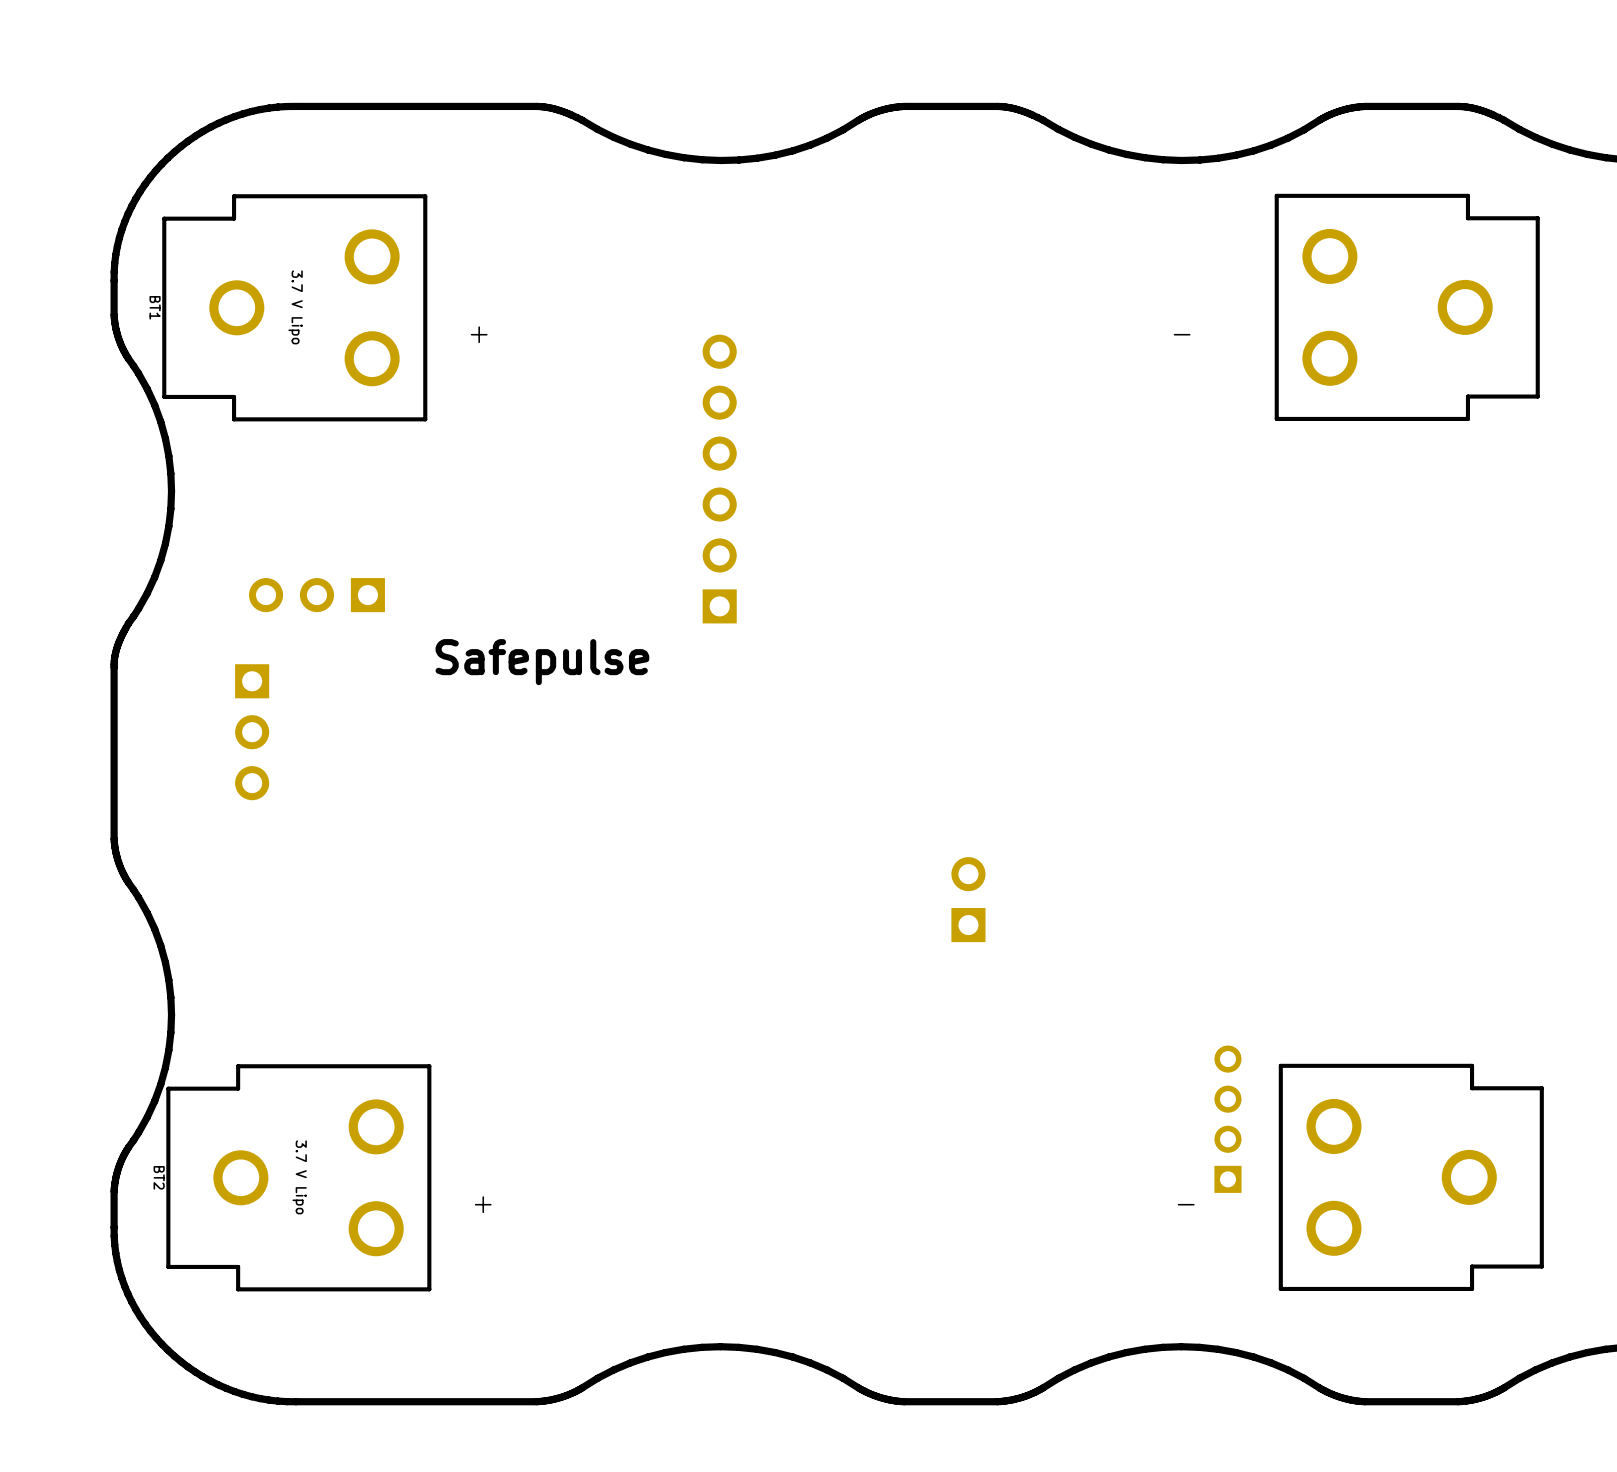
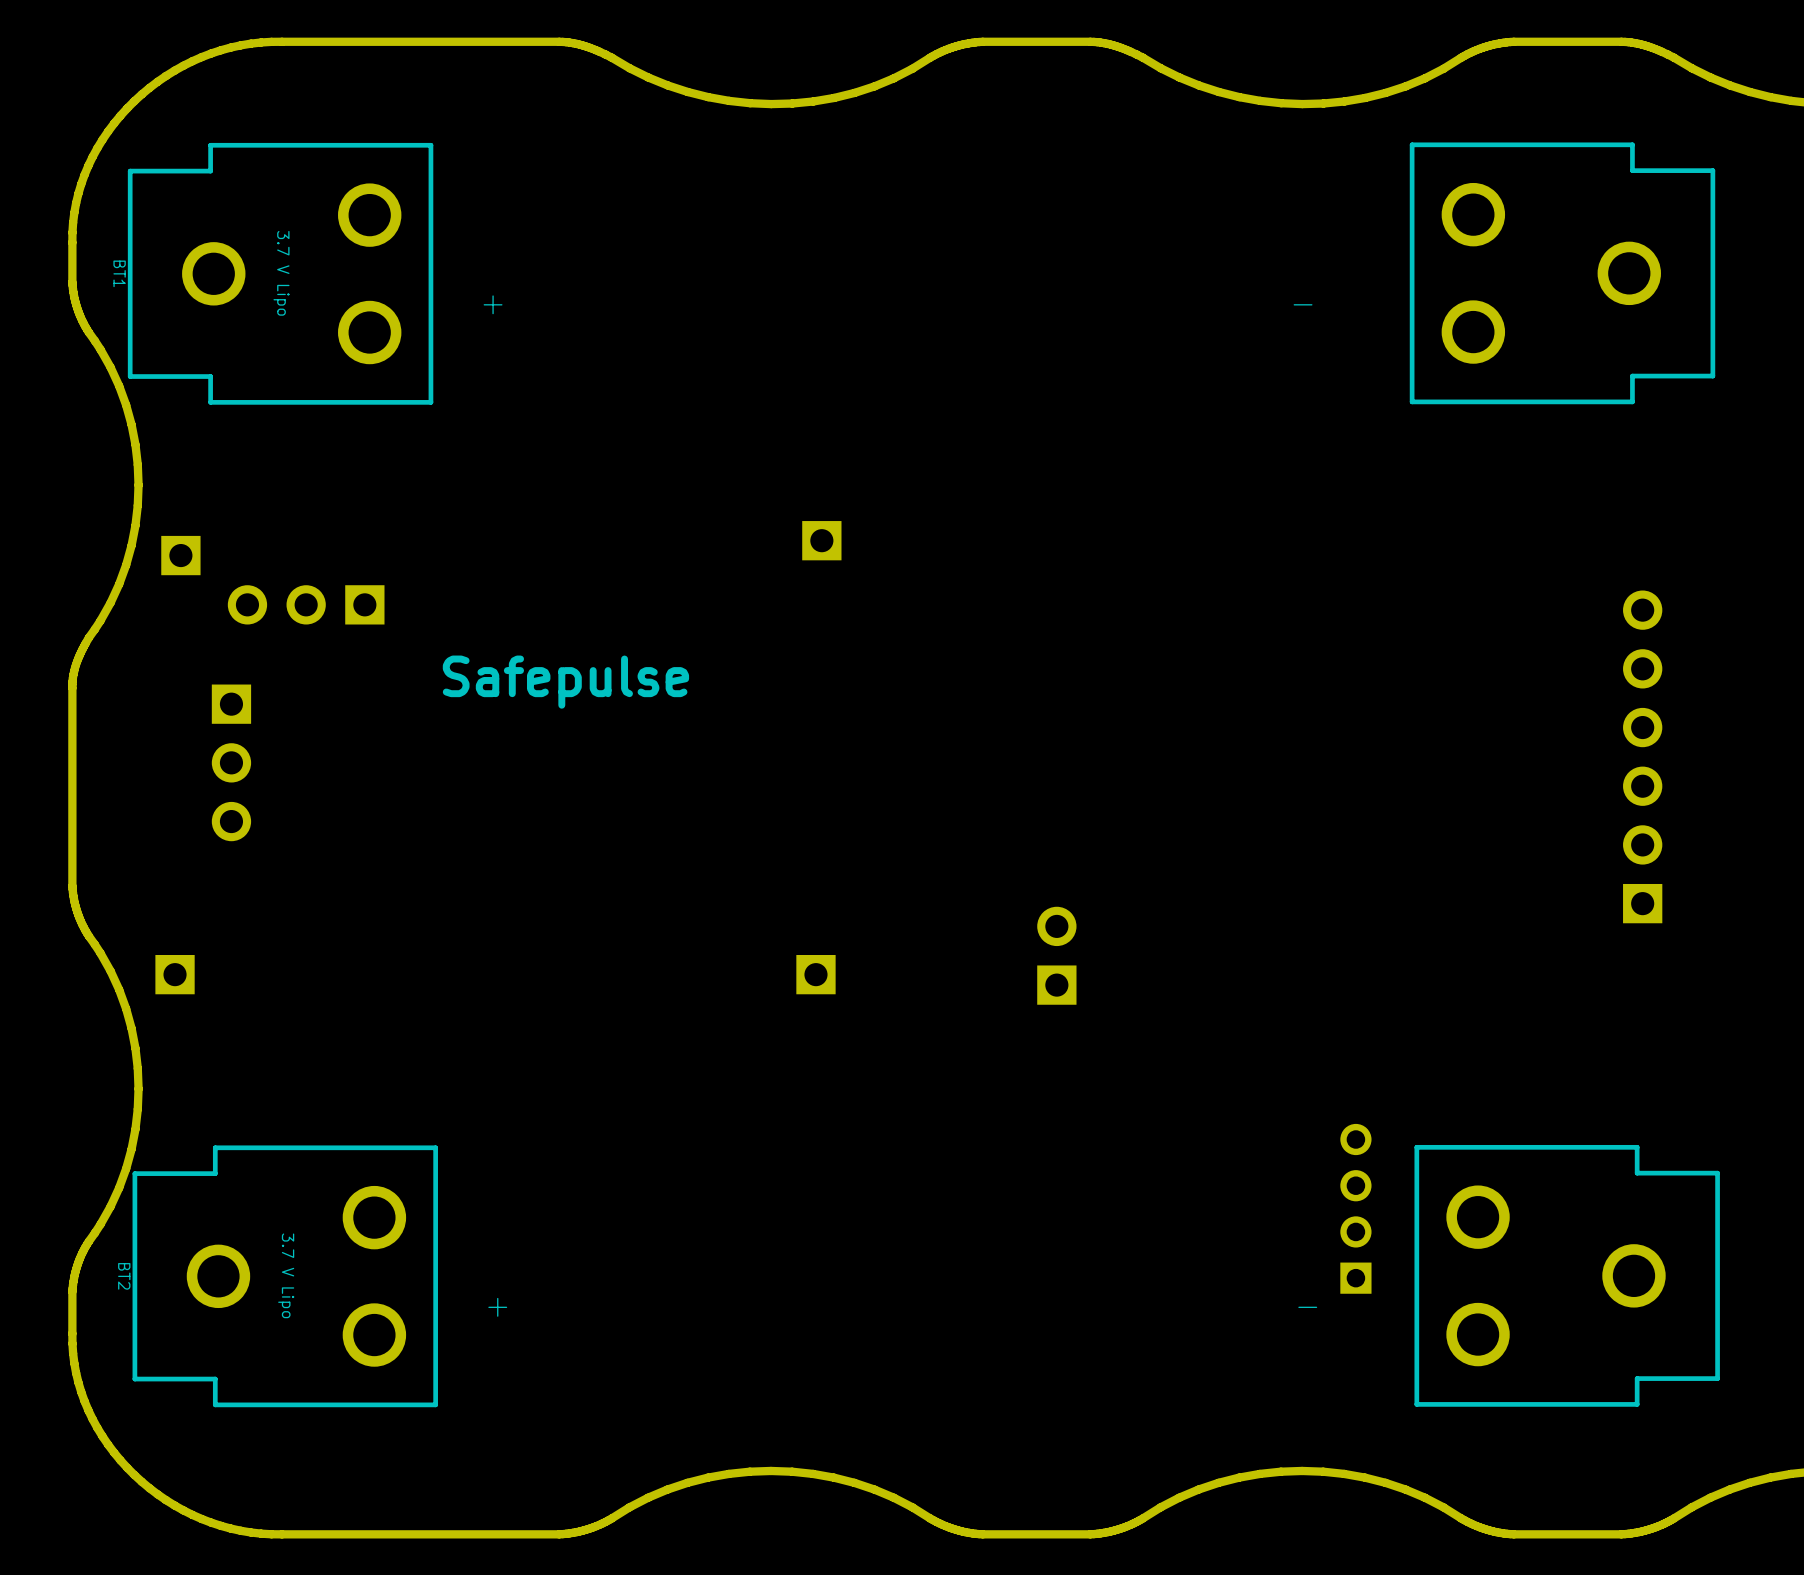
part: (719, 479) -> none
part: none -> (821, 540)
part: none -> (180, 555)
part: none -> (1642, 756)
part: none -> (175, 974)
part: none -> (815, 974)

